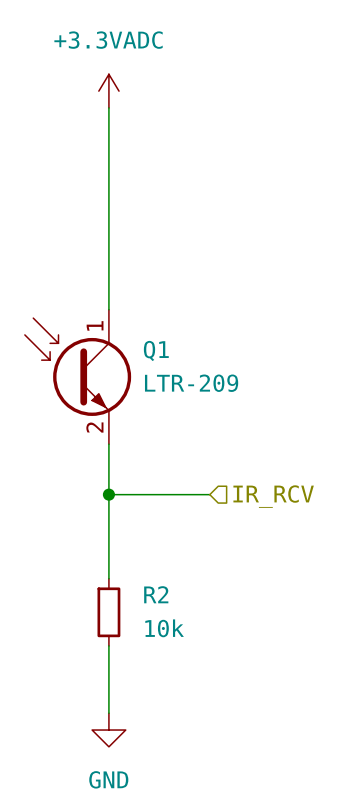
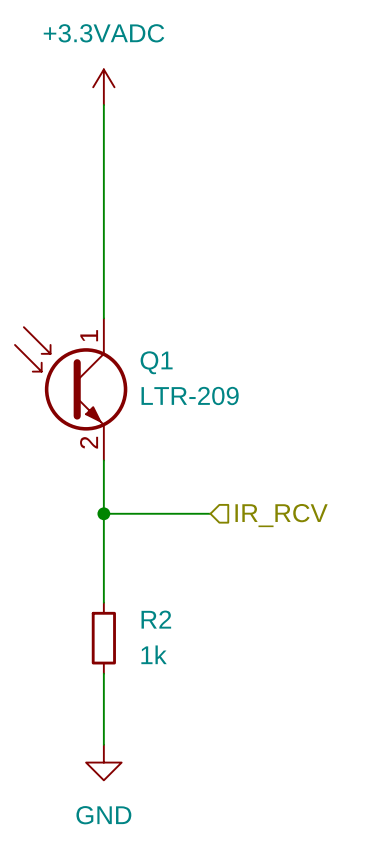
R2 value: 10k (164, 628) -> 1k (154, 654)

